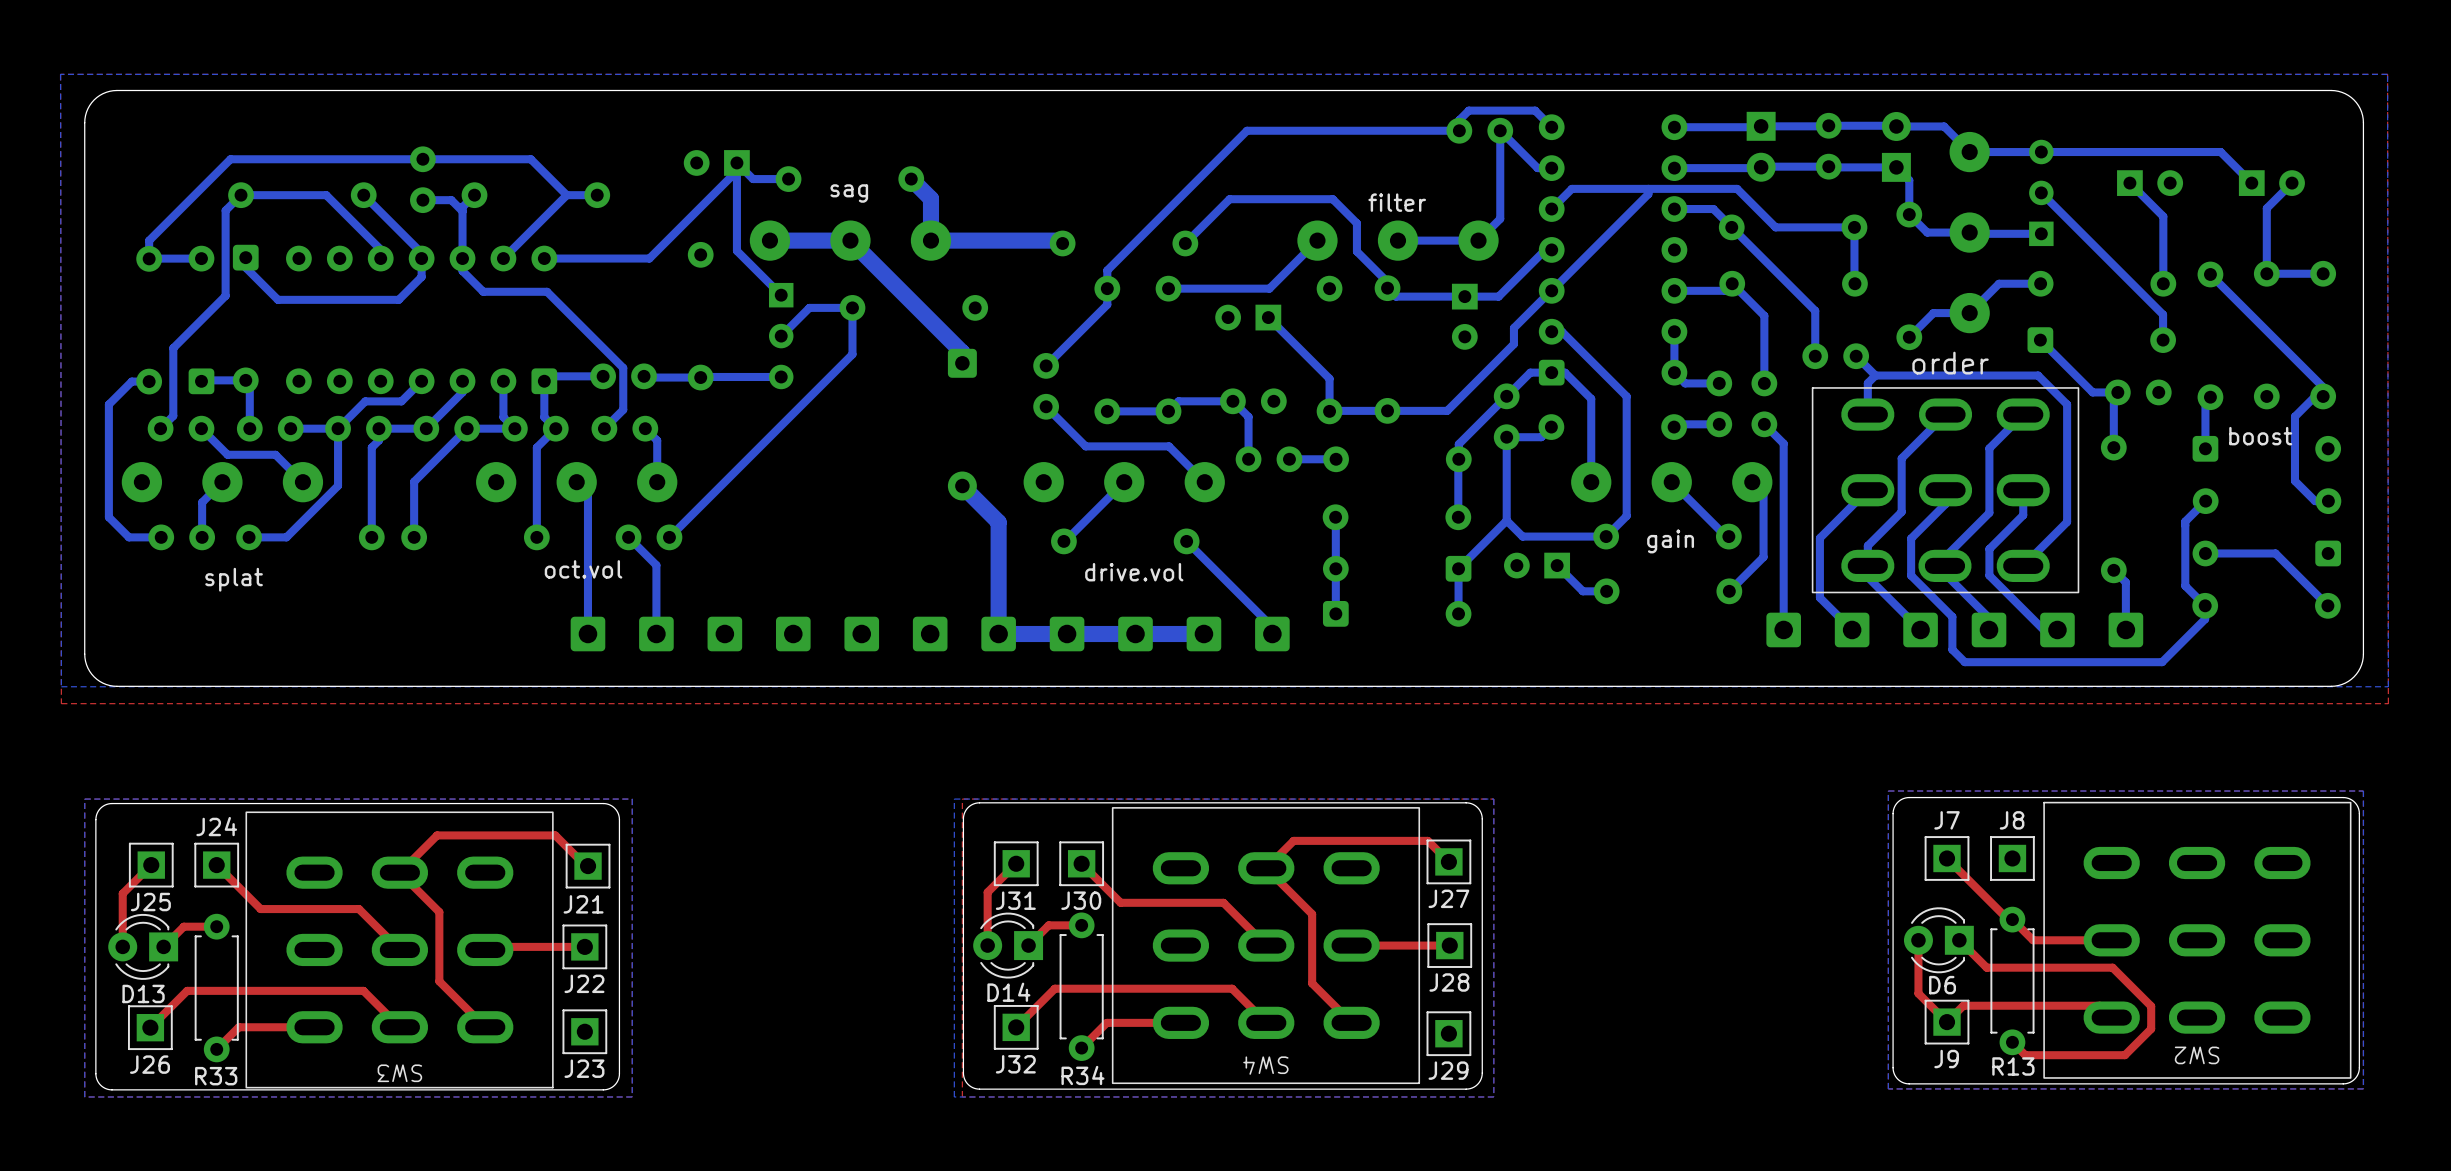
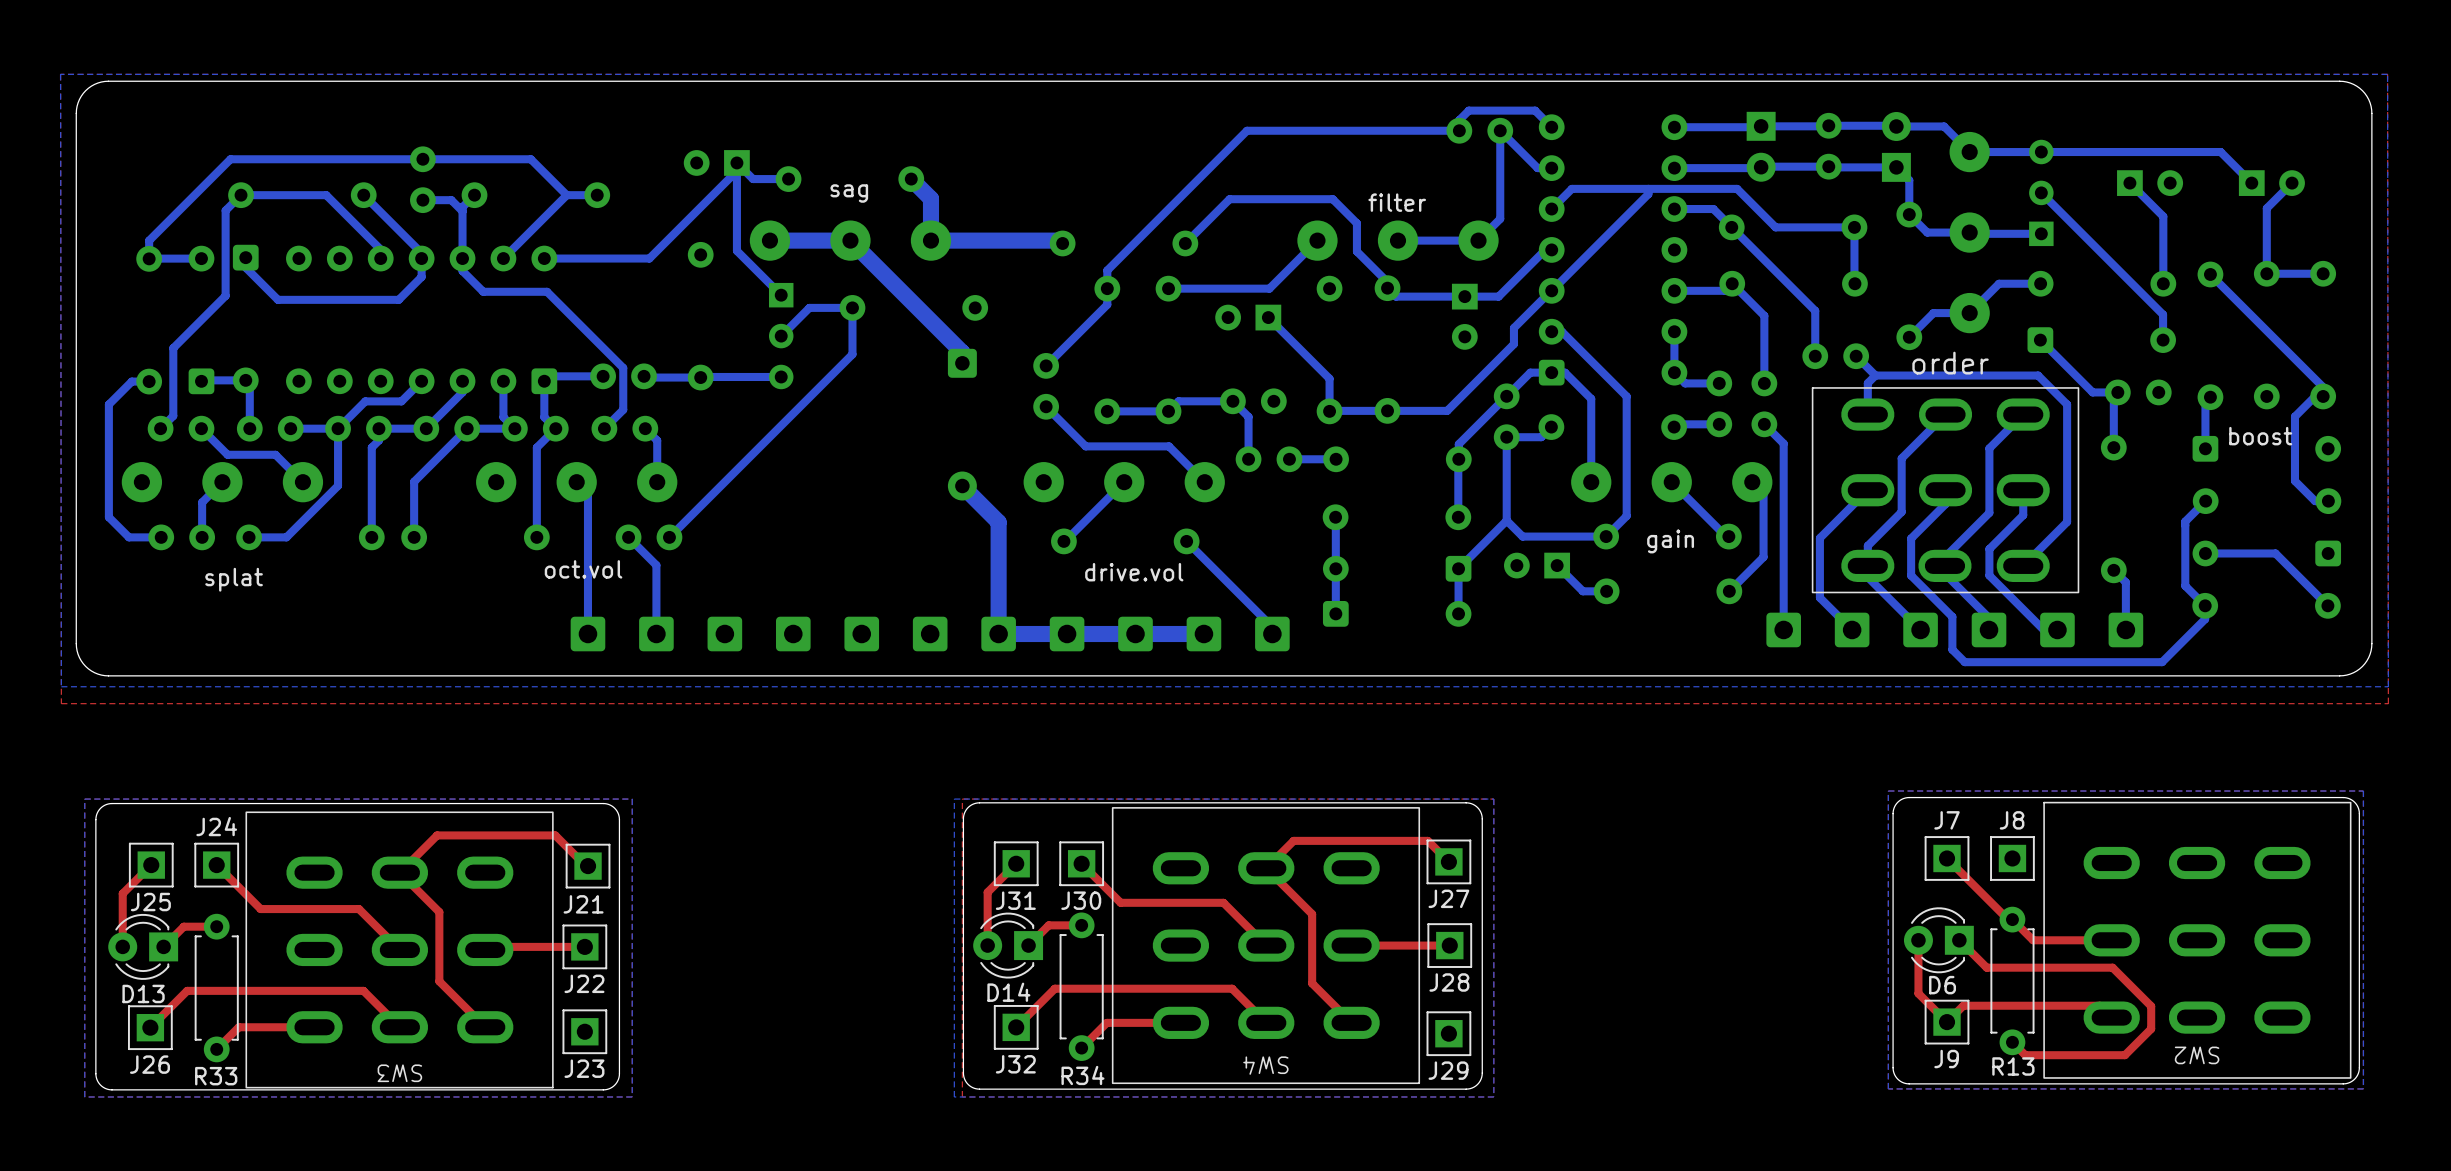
board edge: (2331, 90) (109, 91) (99, 95) (91, 102) (86, 112) (84, 122) (85, 661) (89, 671) (96, 679) (106, 684) (116, 686) (2338, 685) (2348, 681) (2356, 674) (2361, 664) (2363, 654) (2363, 122) (2360, 108) (2353, 99) (2341, 92) (2331, 90) -> (2339, 81) (2353, 84) (2362, 90) (2368, 99) (2371, 113) (2371, 643) (2370, 654) (2364, 663) (2356, 670) (2346, 675) (108, 675) (97, 674) (88, 668) (81, 660) (77, 650) (76, 113) (78, 102) (83, 93) (91, 86) (101, 82) (2339, 81)

